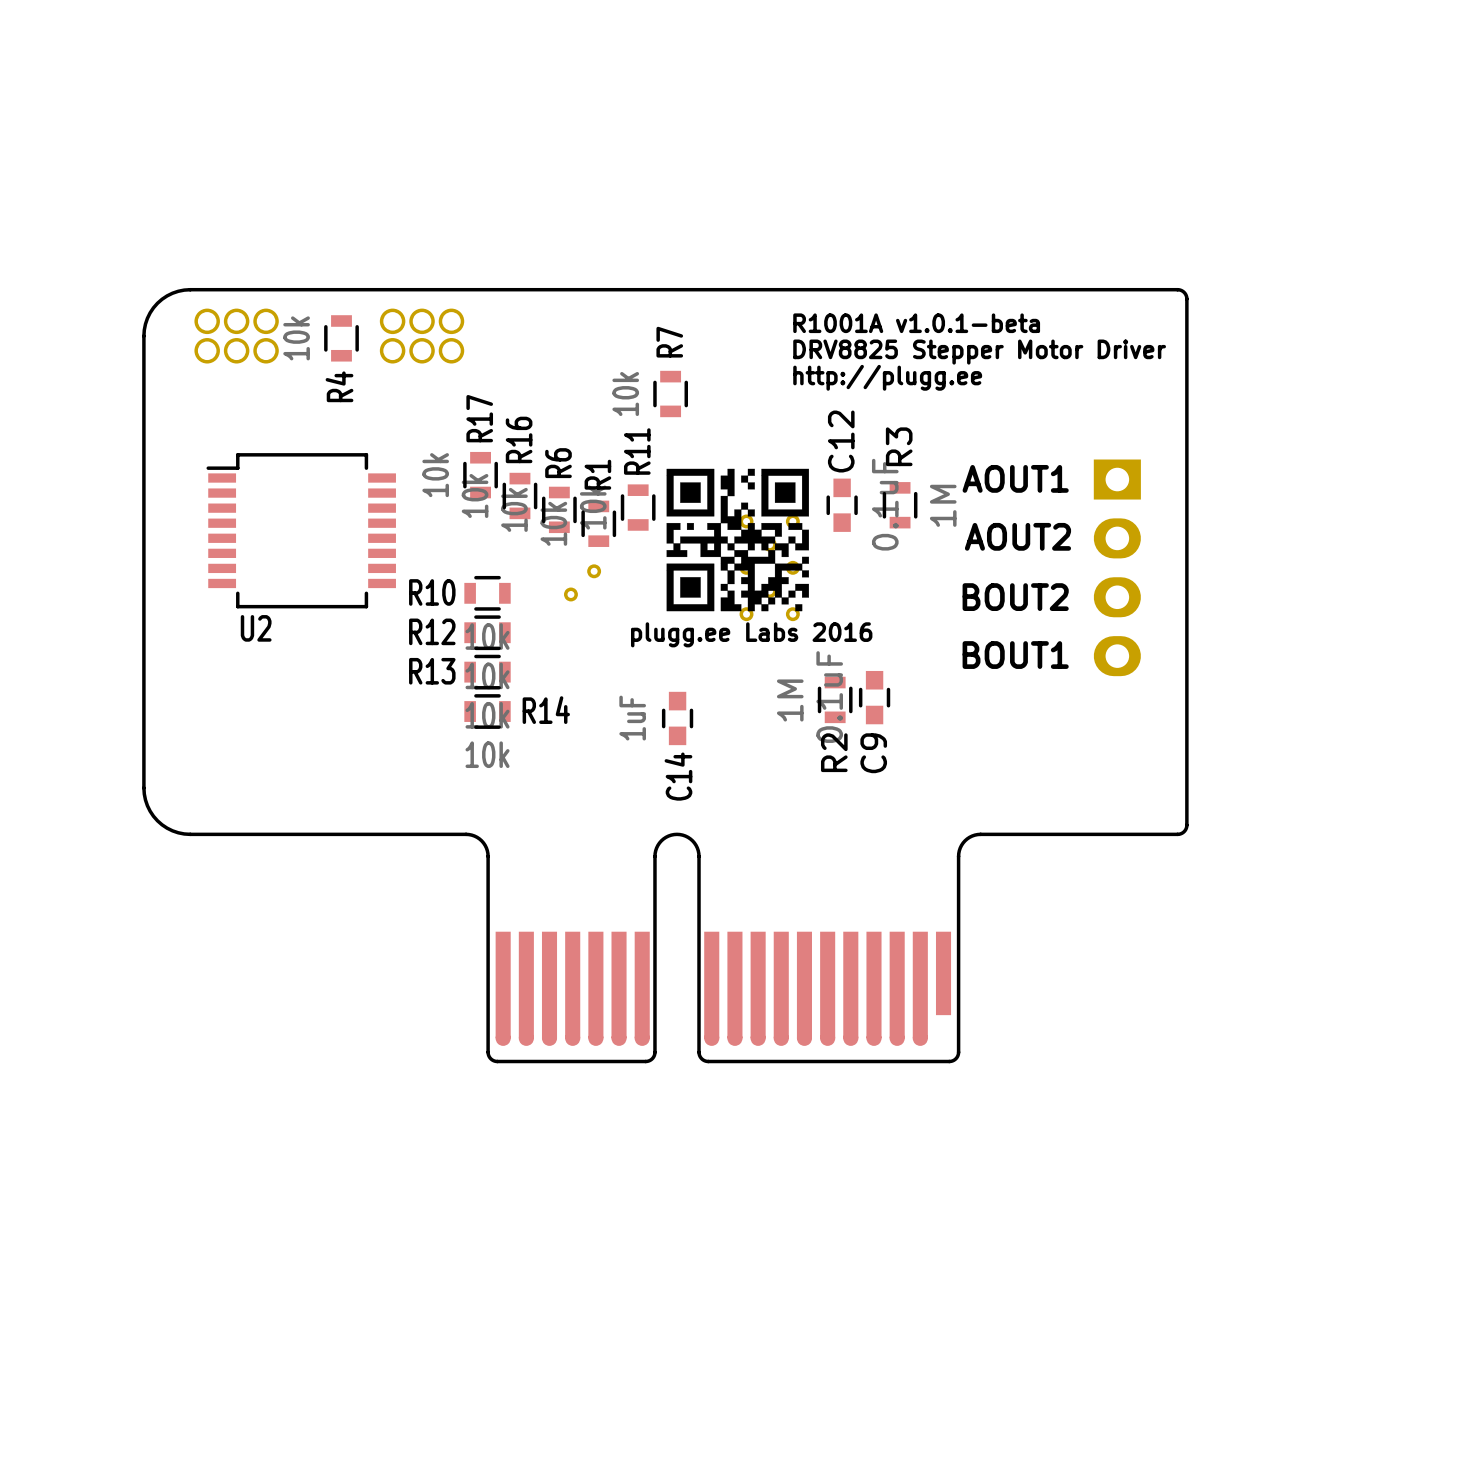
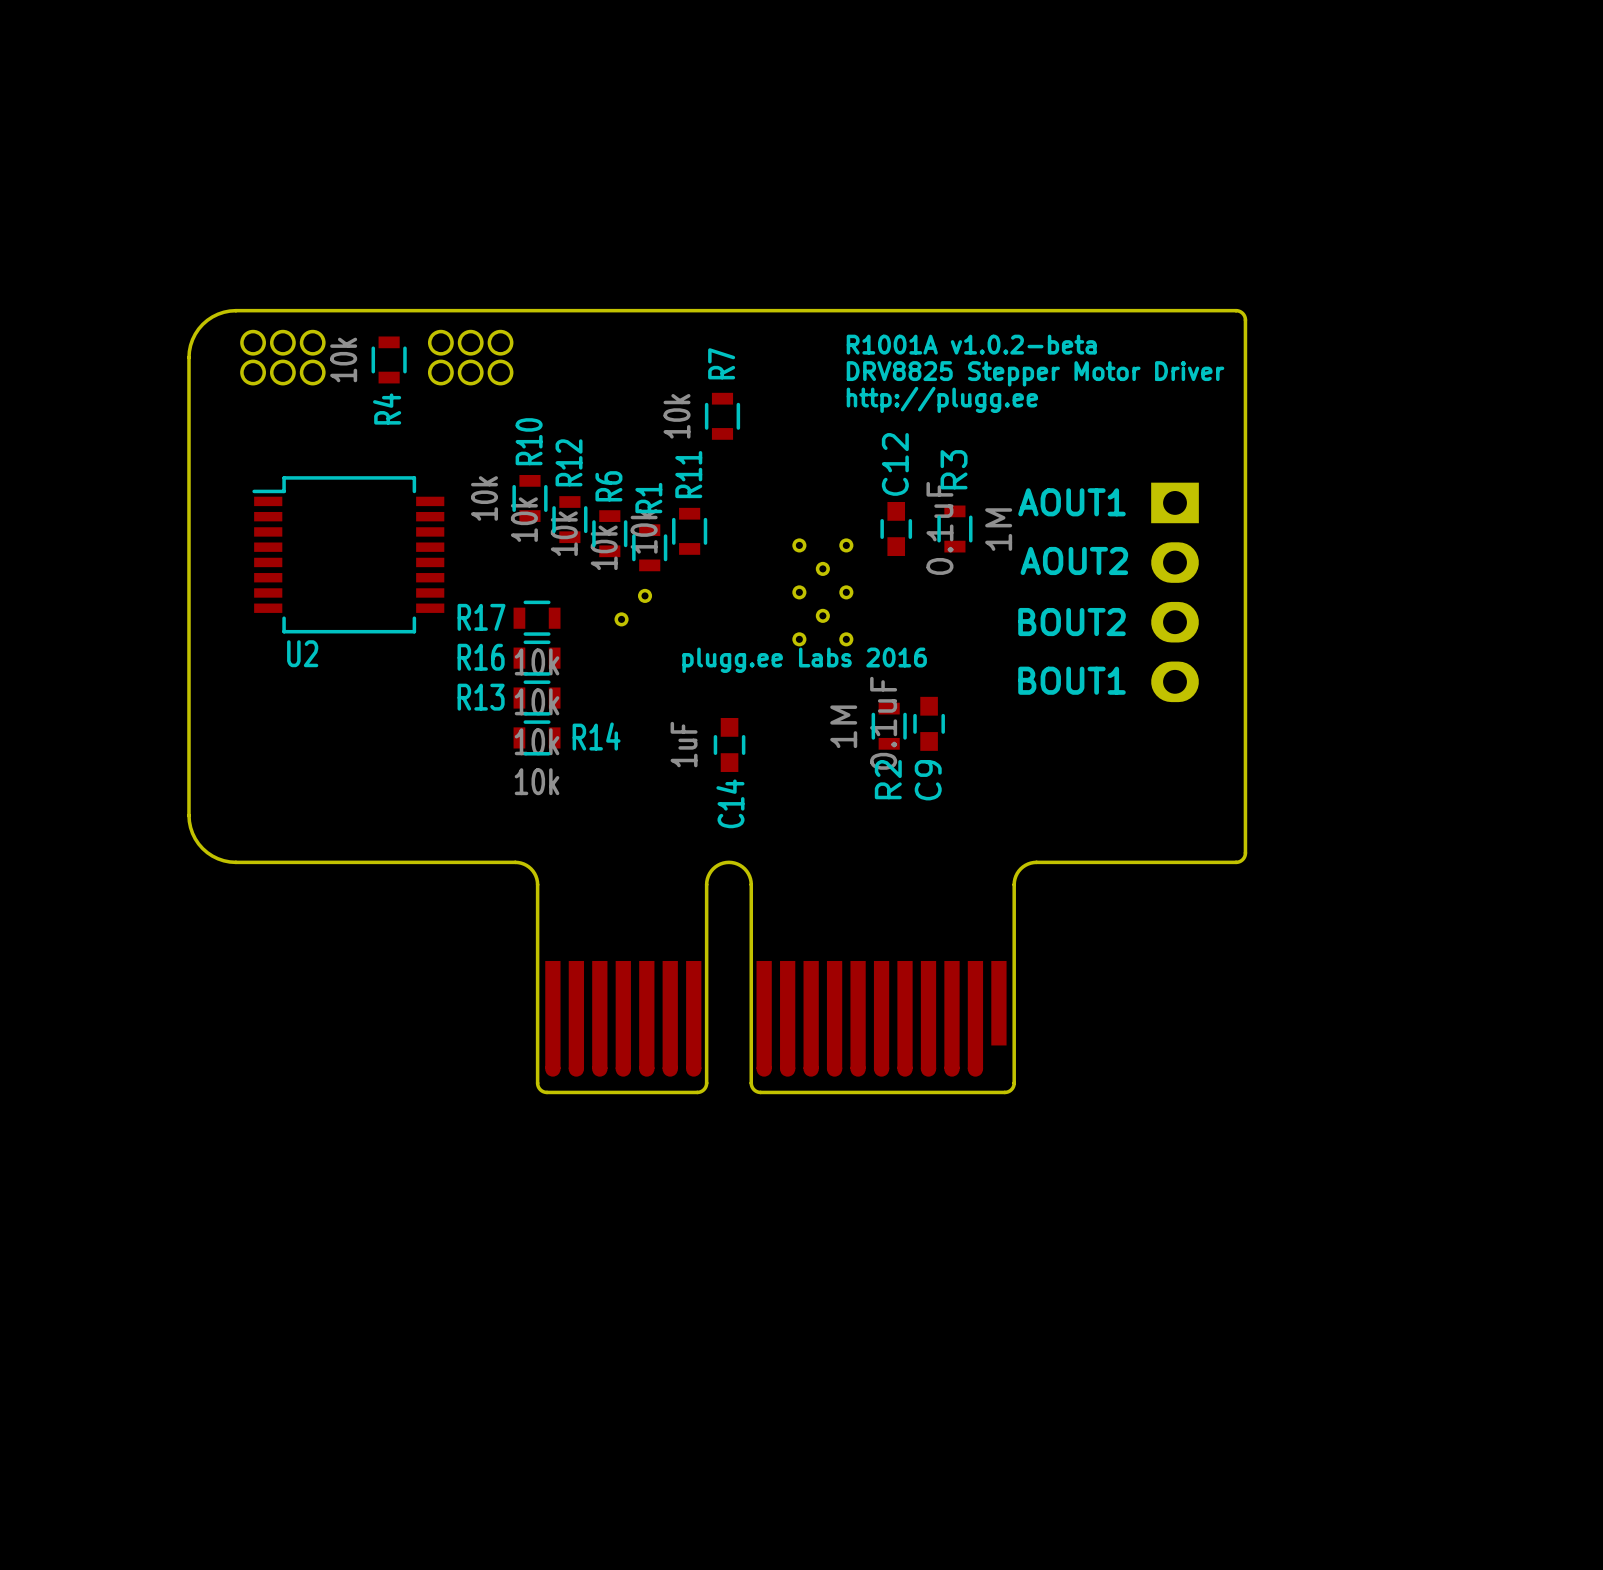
text: R1001A v1.0.1-beta (916, 323) -> R1001A v1.0.2-beta (971, 344)
R17 name: R17 (479, 418) -> R10 (529, 441)
R16 name: R16 (519, 439) -> R12 (569, 462)
drawing: [666, 468, 809, 612] -> none
R10 name: R10 (432, 592) -> R17 (481, 617)
R12 name: R12 (432, 631) -> R16 (481, 657)

